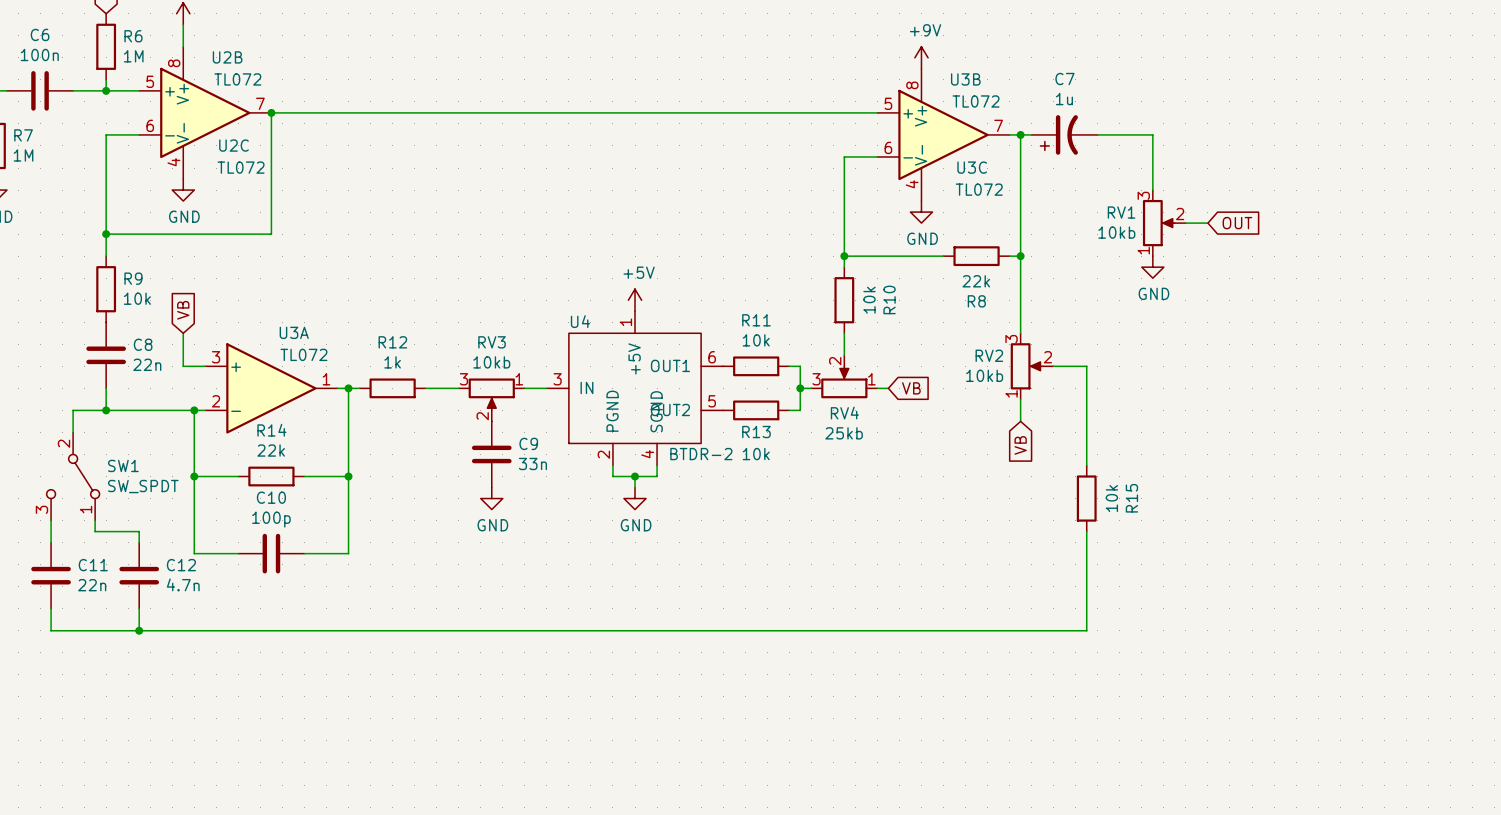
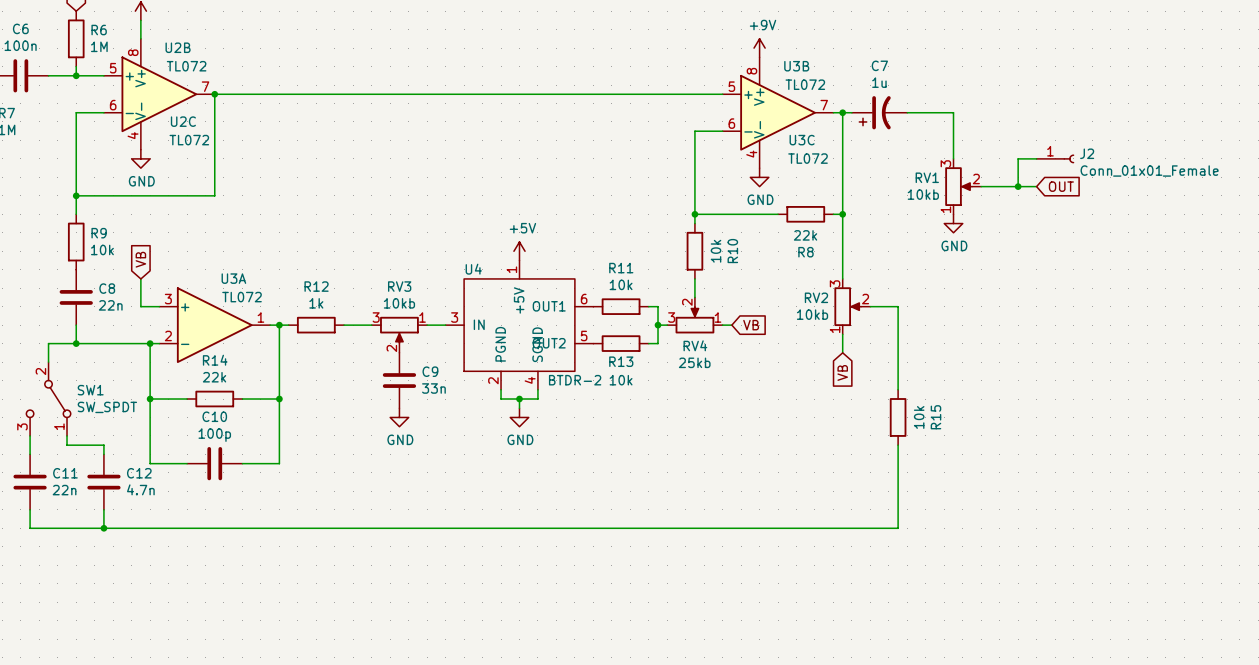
wire: none -> (1036, 158) (1018, 158) (1018, 186)
J2: none -> Conn_01x01_Female (1055, 158)
wire: none -> (999, 186) (1036, 186)
junction: none -> (1018, 186)
global label position: OUT (1237, 223) -> OUT (1061, 186)

